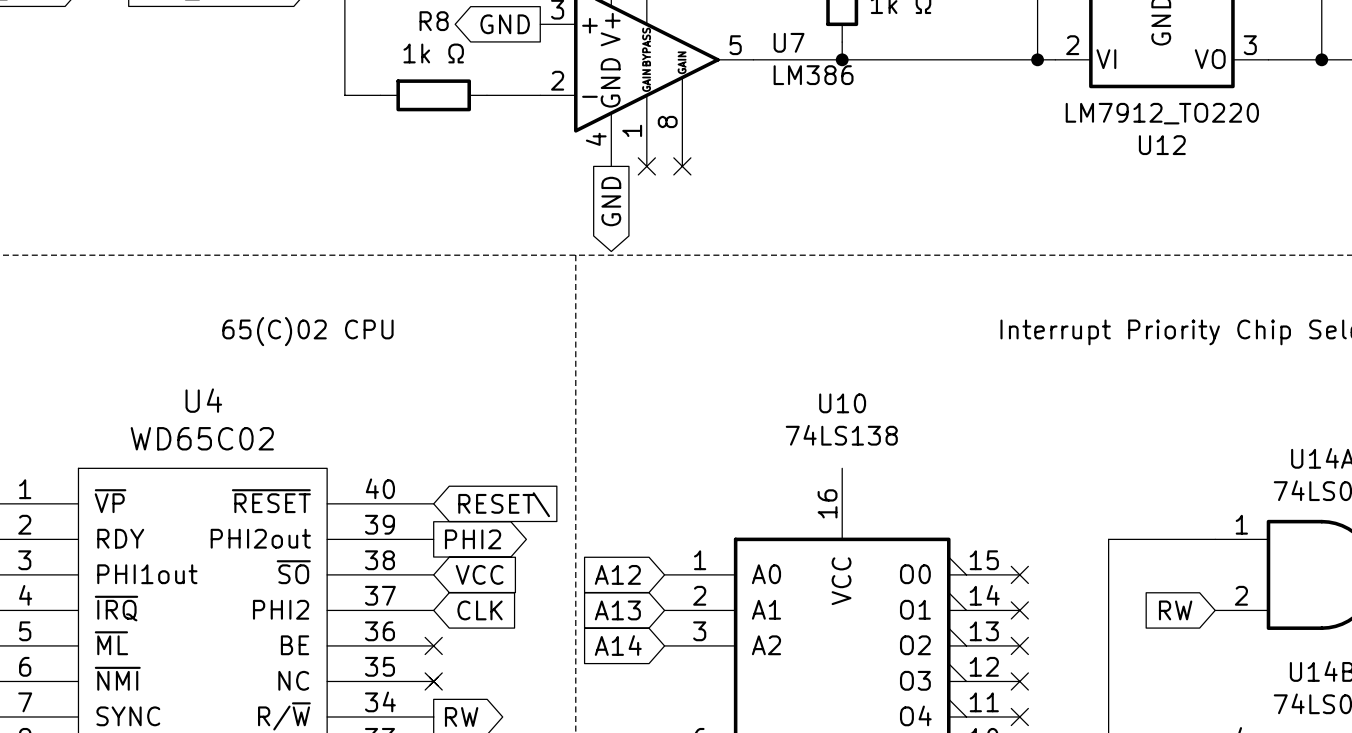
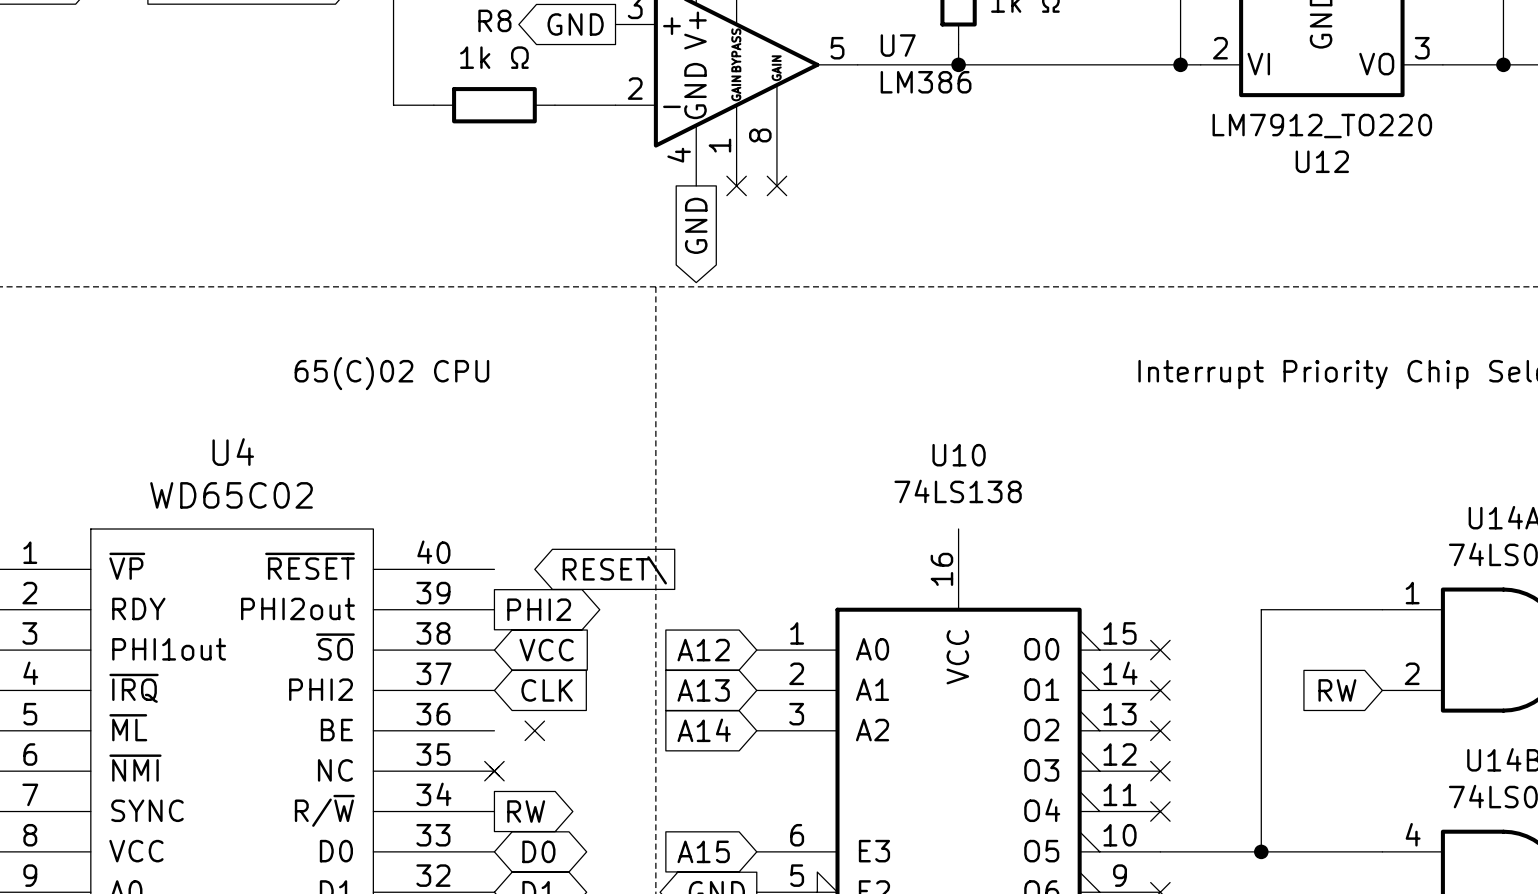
text position: 65(C)02 CPU (307, 331) -> 65(C)02 CPU (391, 373)
global label position: RESET\ (504, 504) -> RESET\ (614, 570)
no-connect mark position: (433, 645) -> (534, 730)

